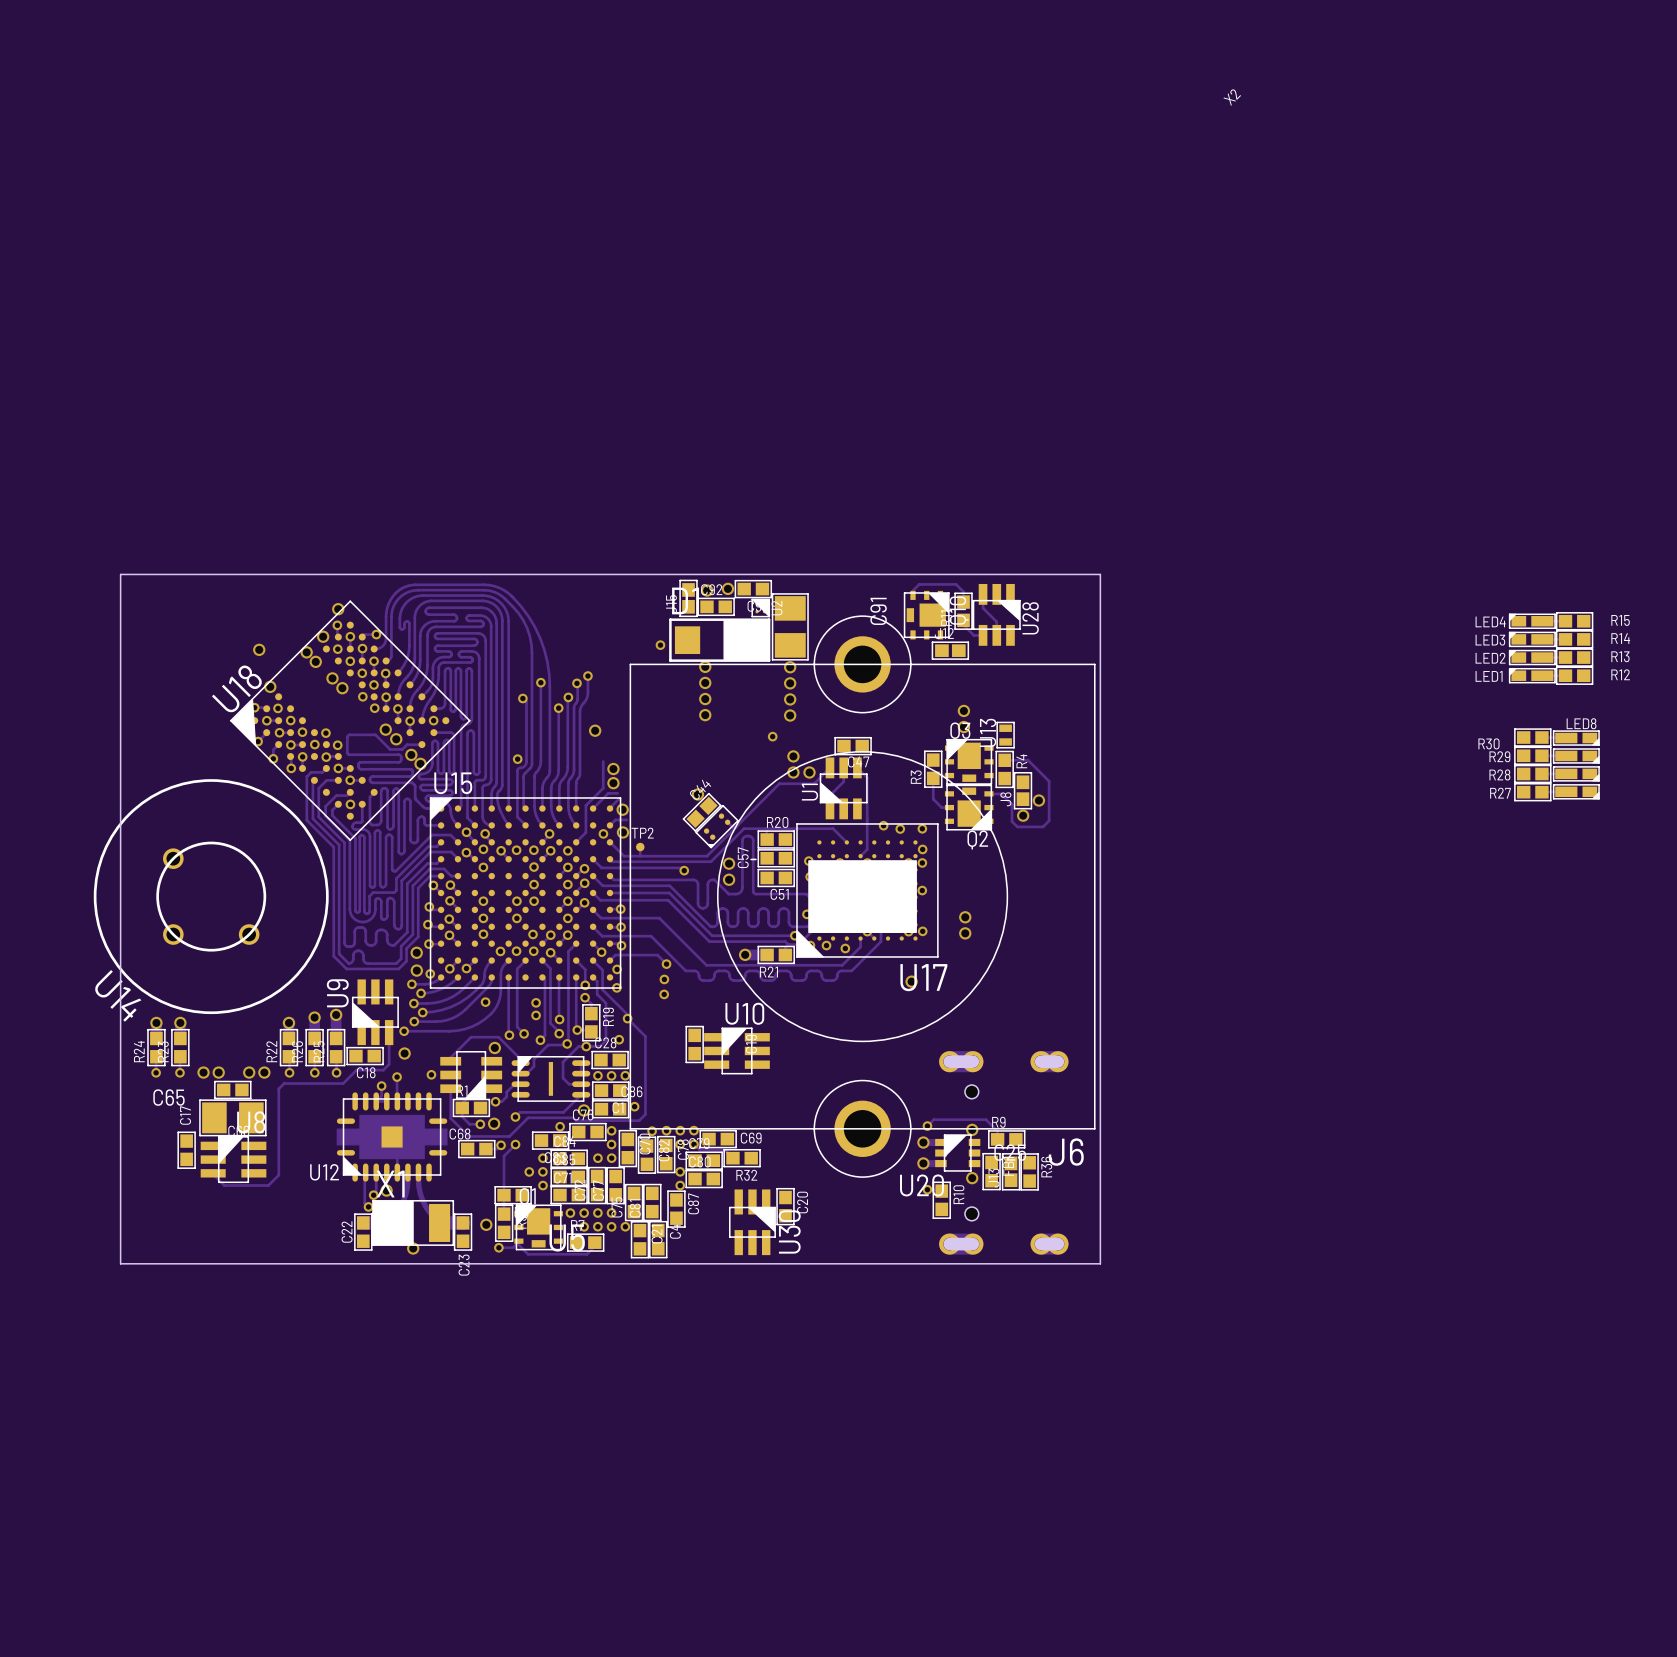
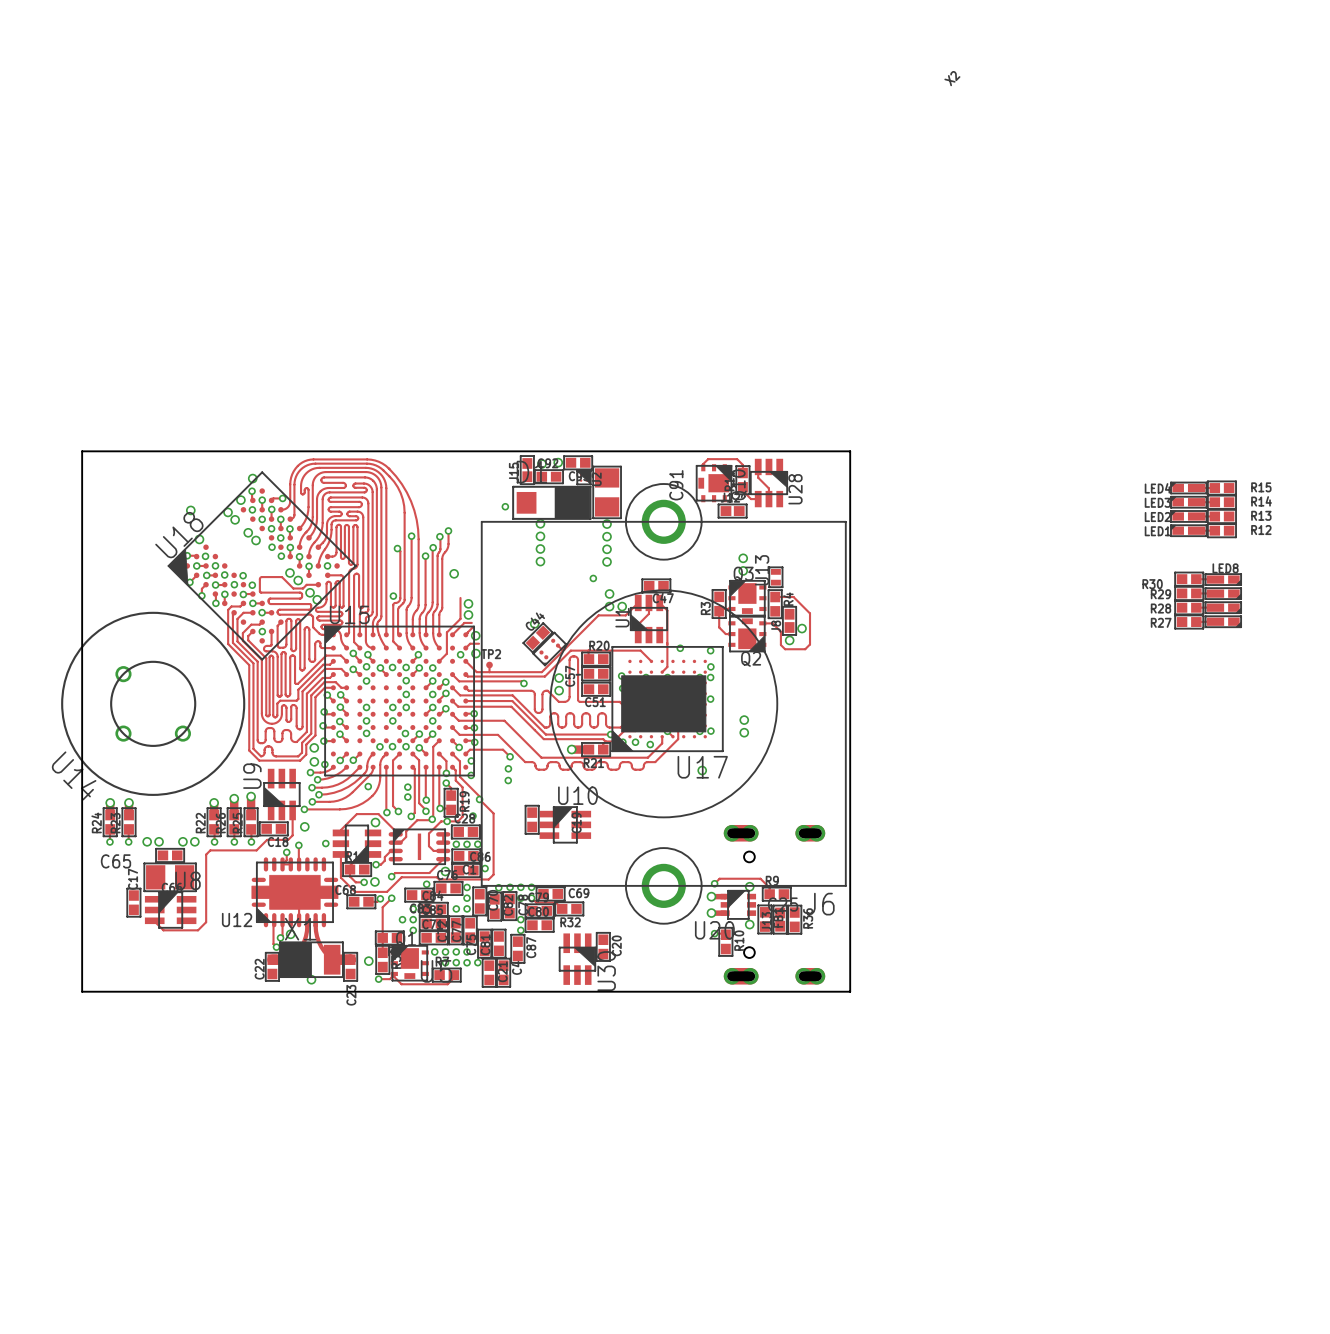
via: (900, 829) -> none
via: (806, 914) -> none

